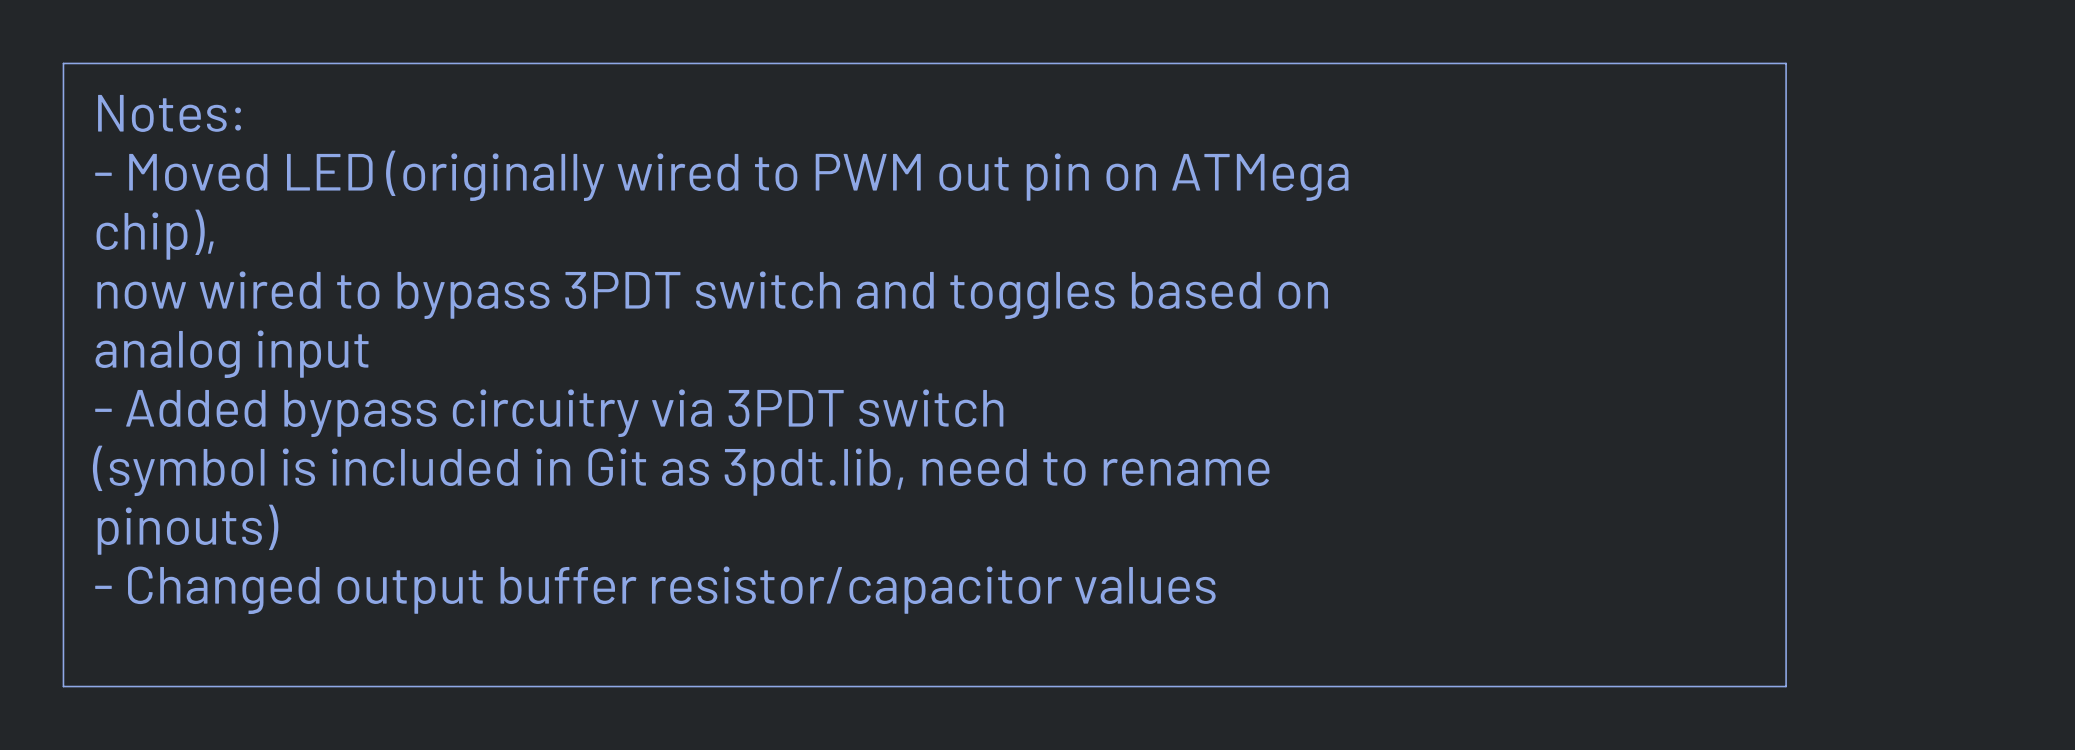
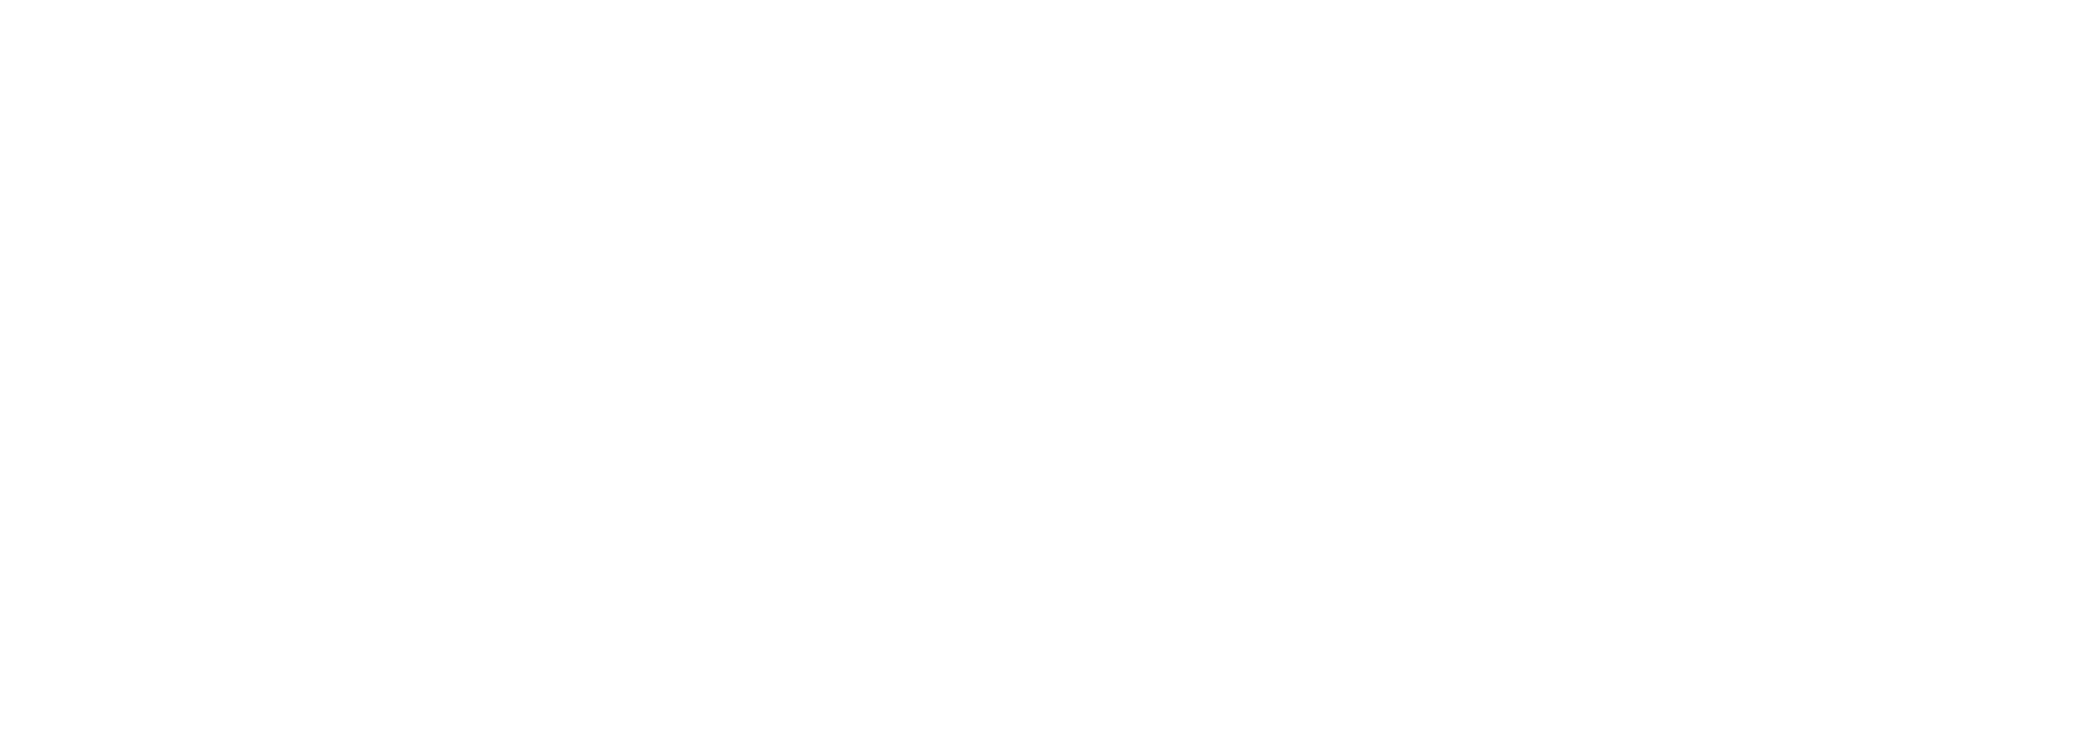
line: (63, 63) (1786, 63) (1786, 686) (63, 686) (63, 63) -> none
text: Notes: (169, 113) -> none
text: - Moved LED (originally wired to PWM out pin on ATMega (721, 175) -> none
text: chip), (155, 234) -> none
text: now wired to bypass 3PDT switch and toggles based on (712, 295) -> none
text: analog input (232, 354) -> none
text: - Added bypass circuitry via 3PDT switch (549, 413) -> none
text: (symbol is included in Git as 3pdt.lib, need to rename (681, 470) -> none
text: pinouts) (188, 529) -> none
text: - Changed output buffer resistor/capacitor values (655, 590) -> none

